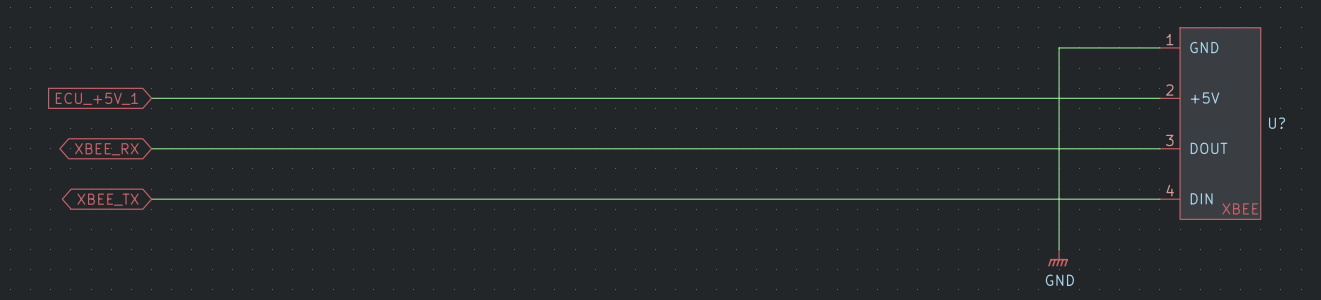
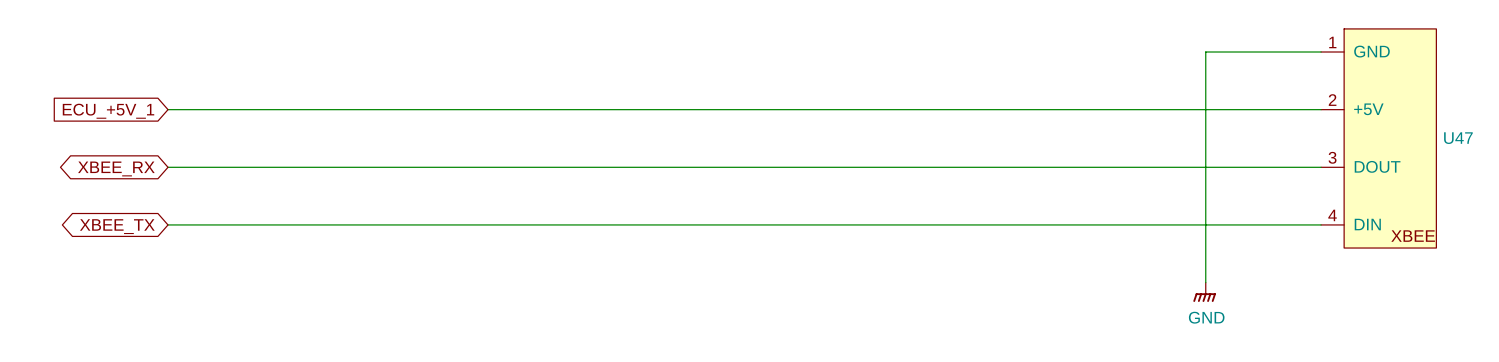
U? name: U? (1277, 123) -> U47 (1458, 138)

